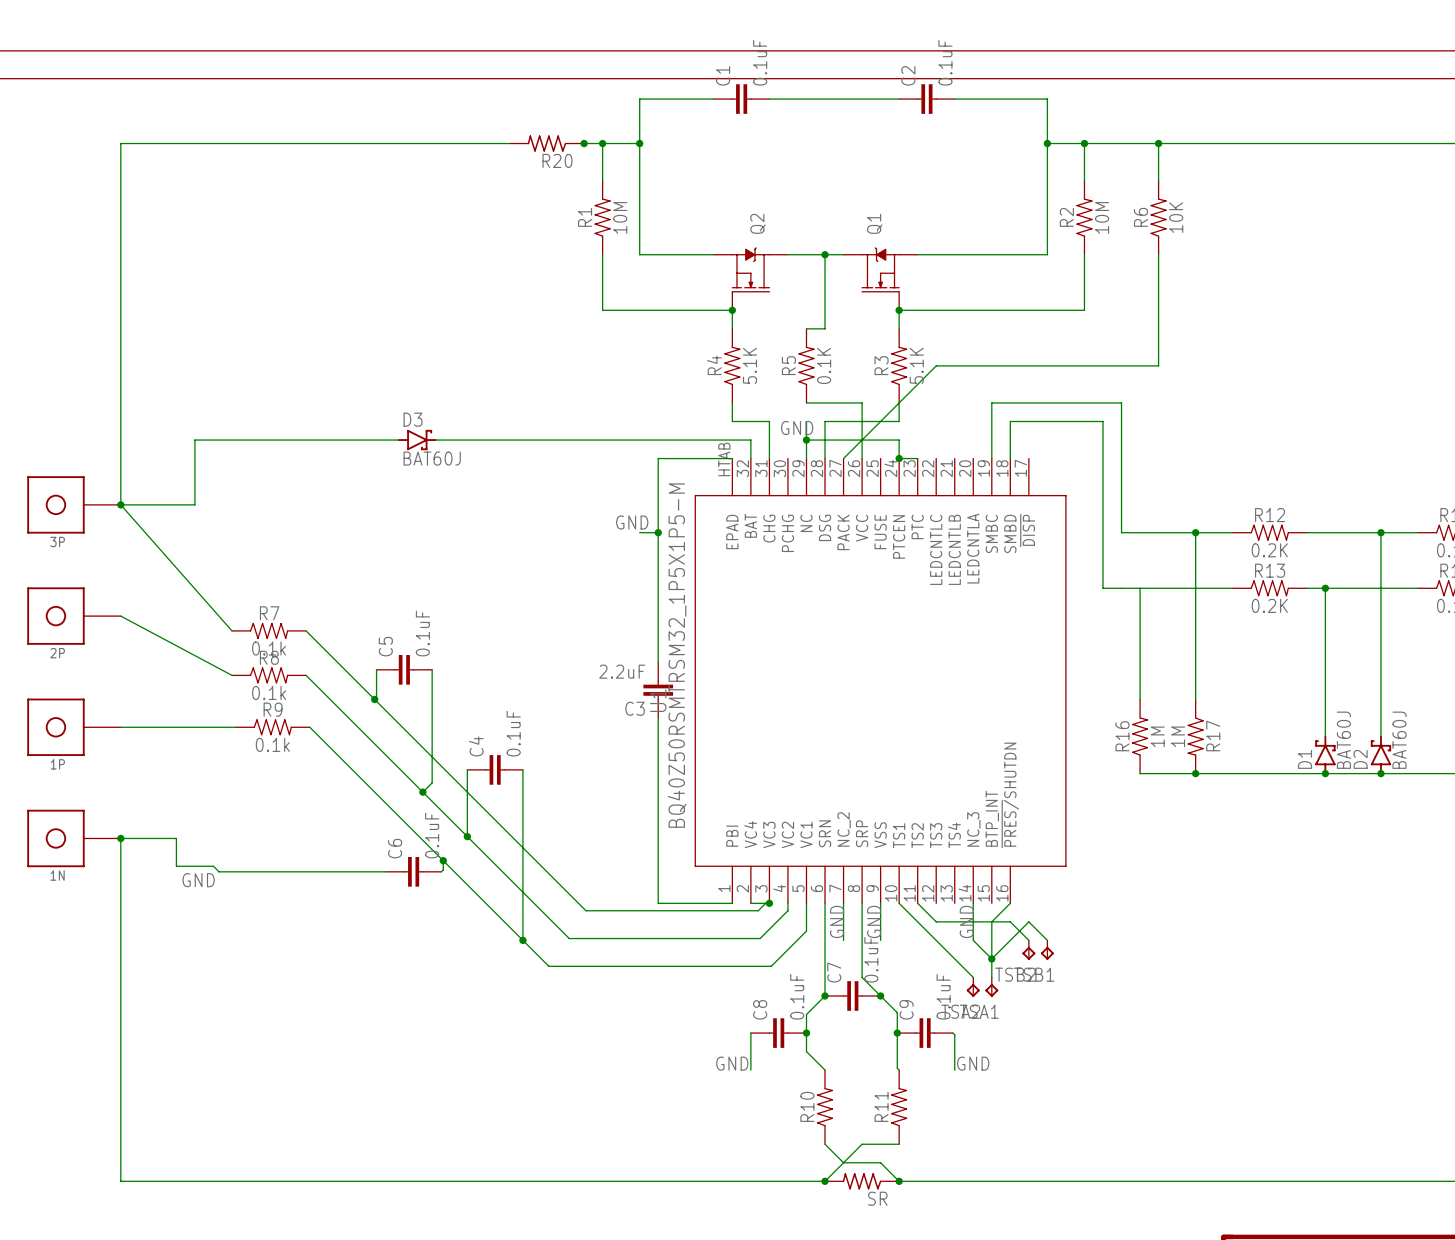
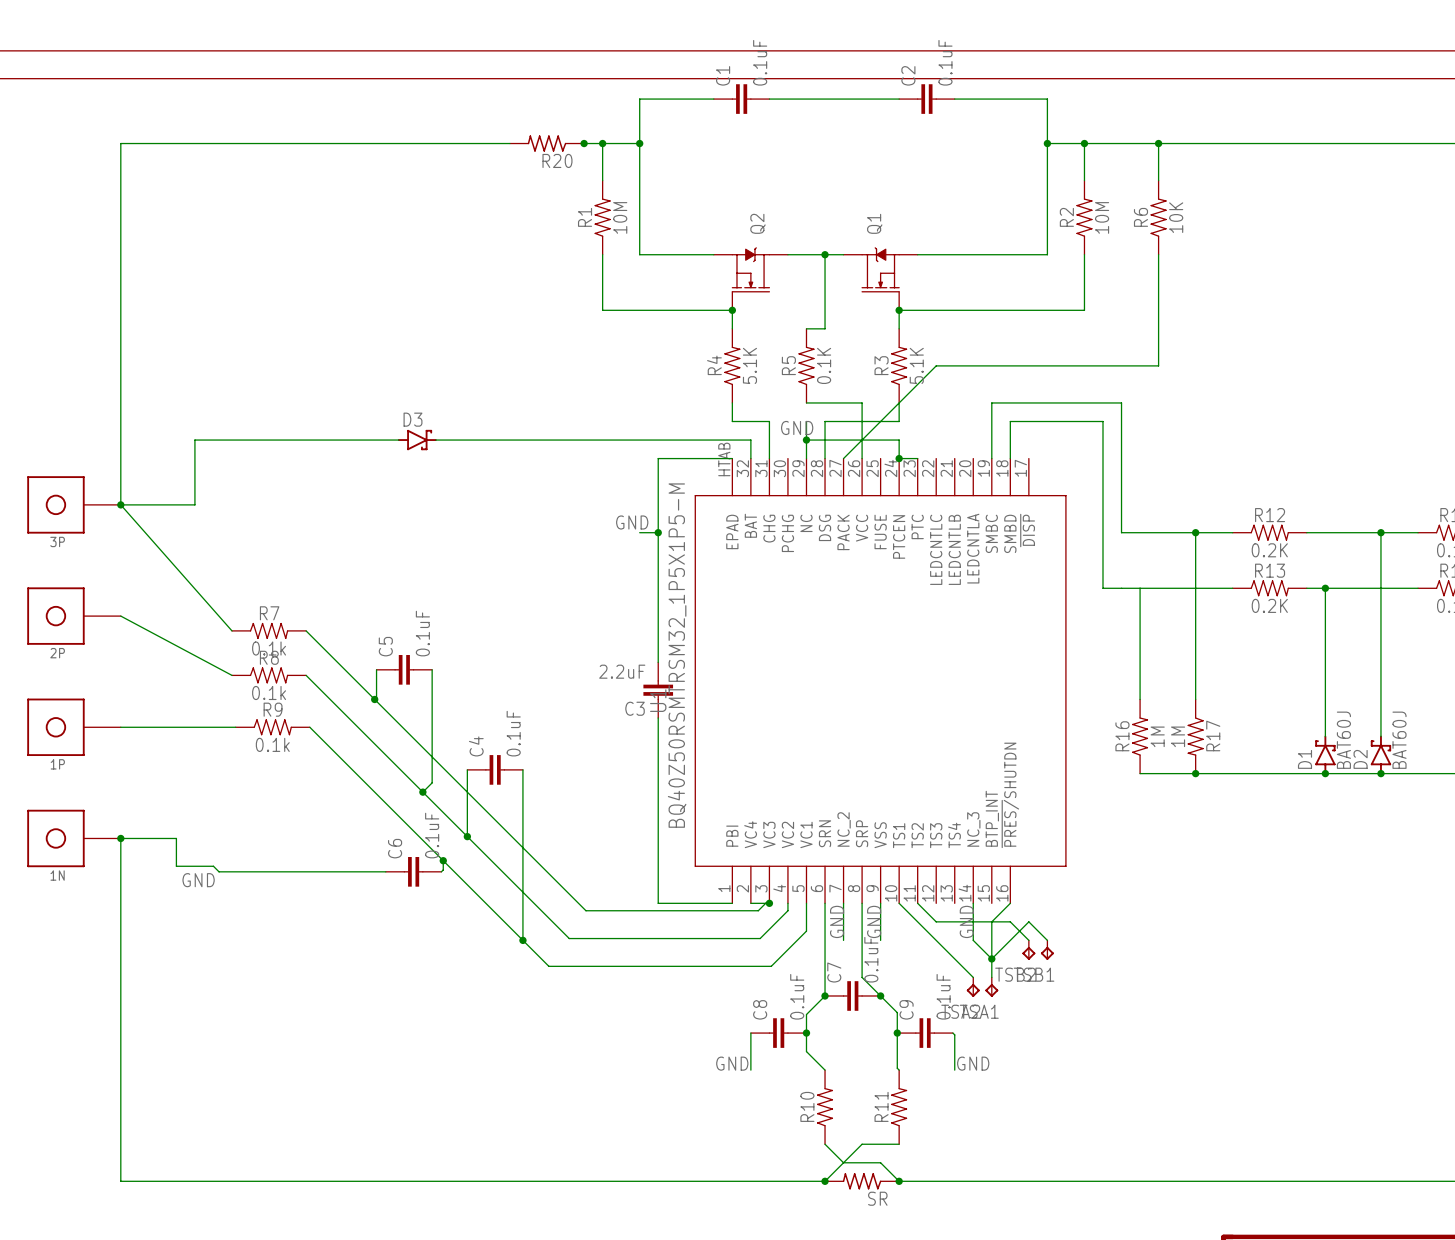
D3 value: BAT60J (432, 458) -> none

